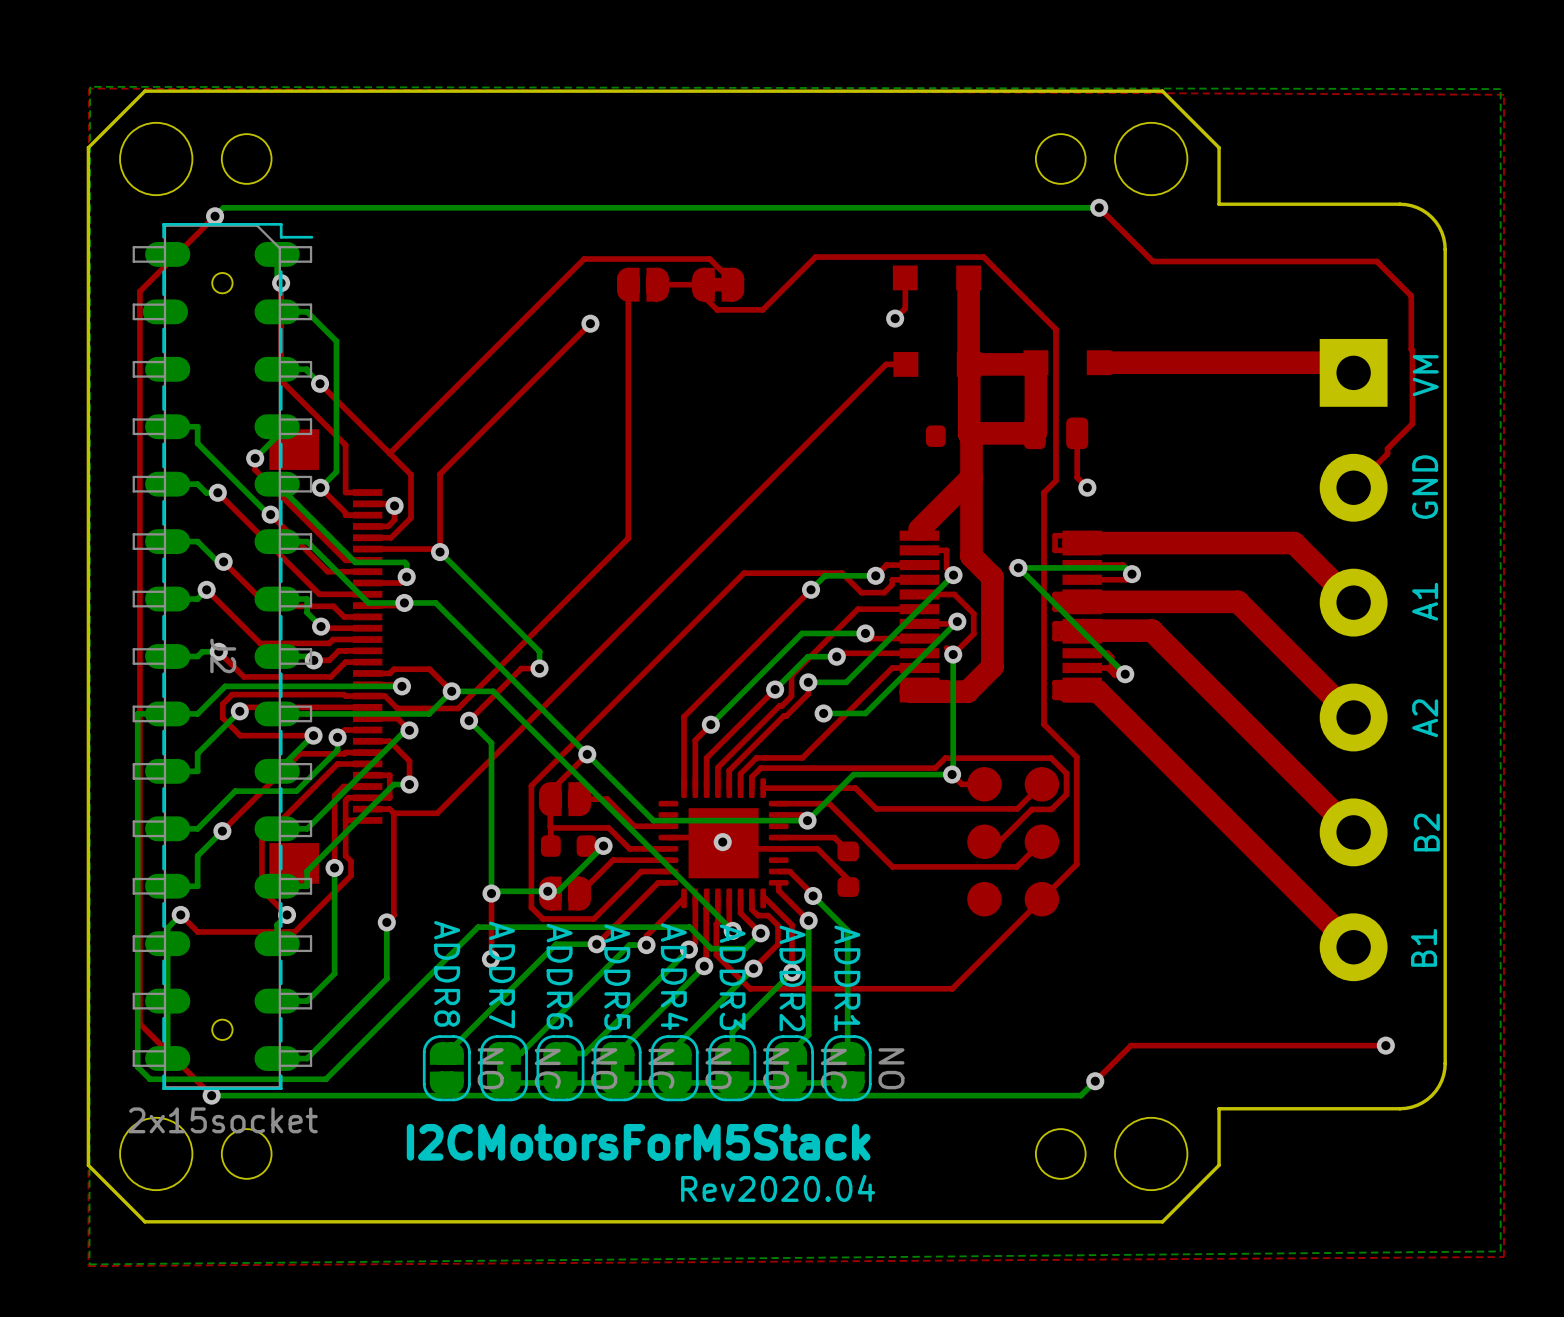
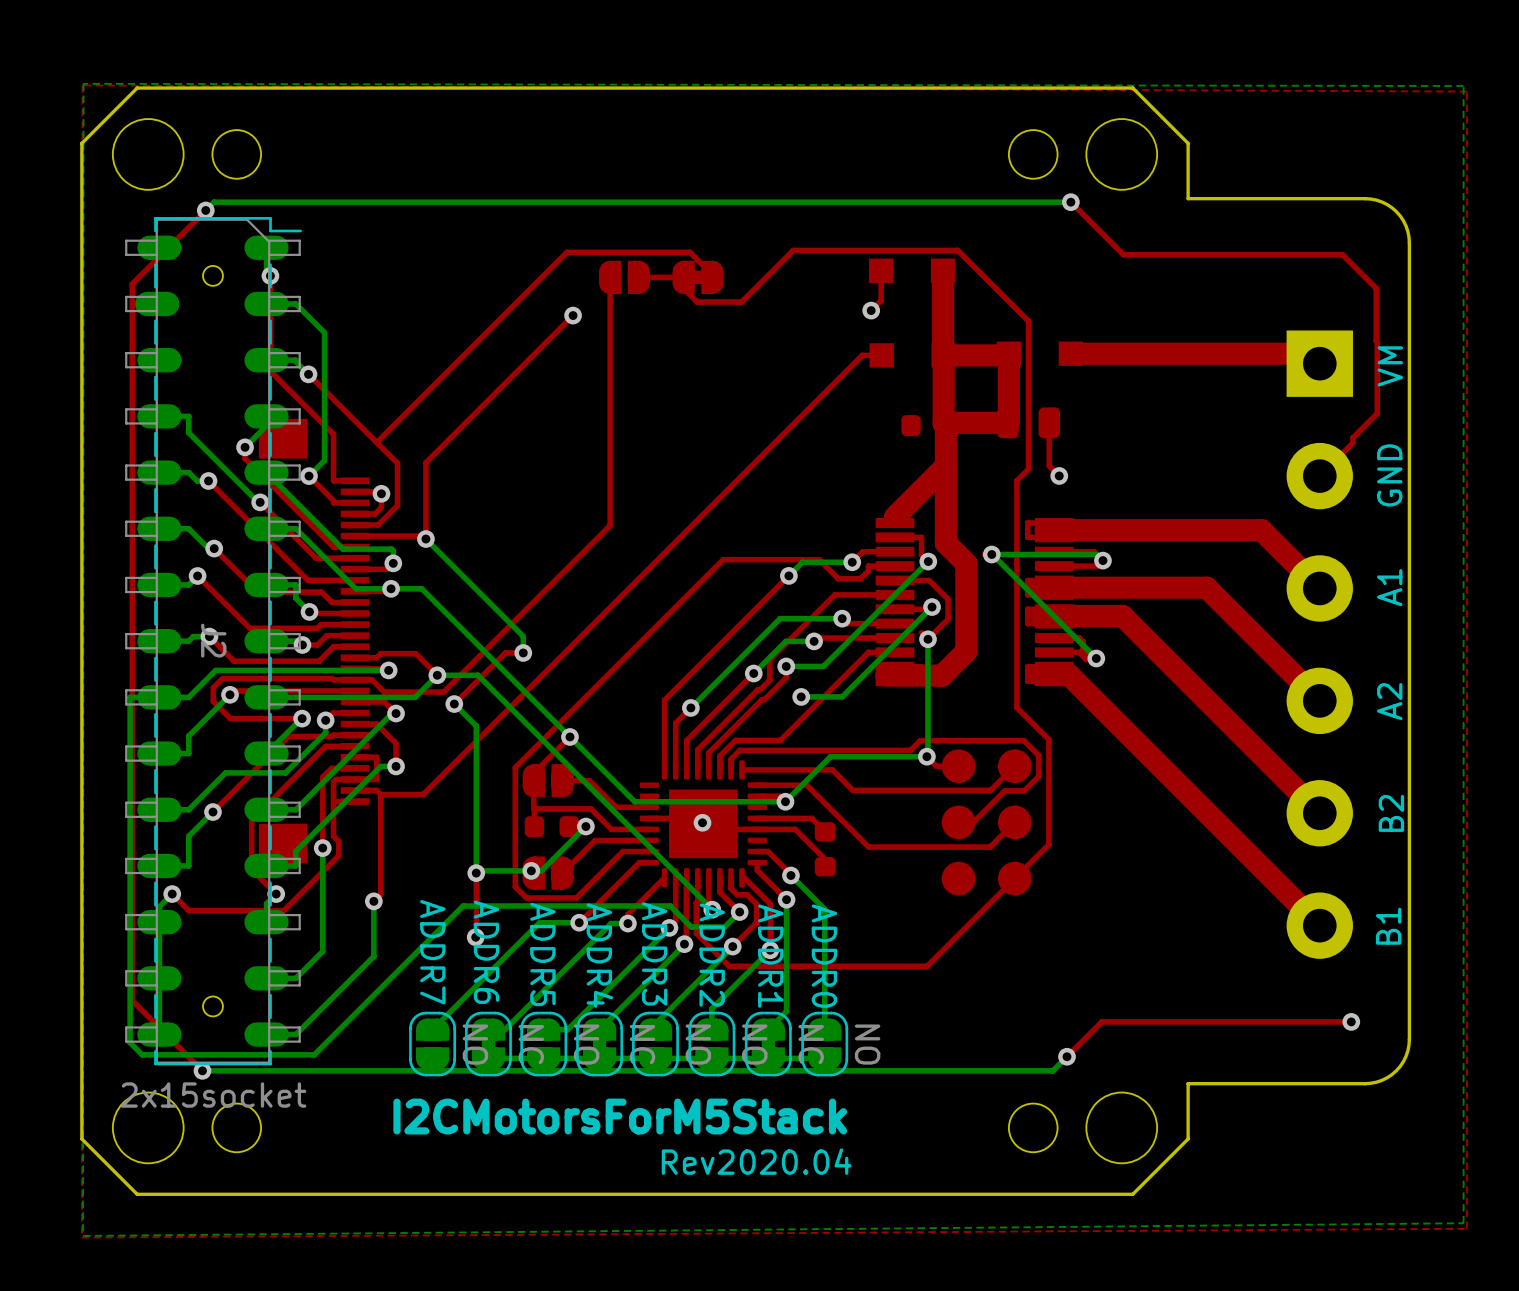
ADDR8 name: ADDR8 (447, 973) -> ADDR7 (432, 952)
ADDR7 name: ADDR7 (501, 974) -> ADDR6 (486, 952)
ADDR6 name: ADDR6 (559, 976) -> ADDR5 (542, 954)
ADDR4 name: ADDR4 (674, 976) -> ADDR3 (654, 953)
ADDR5 name: ADDR5 (617, 977) -> ADDR4 (599, 955)
ADDR3 name: ADDR3 (732, 977) -> ADDR2 (712, 955)
ADDR2 name: ADDR2 (792, 978) -> ADDR1 (770, 956)
ADDR1 name: ADDR1 (847, 978) -> ADDR0 (824, 956)

